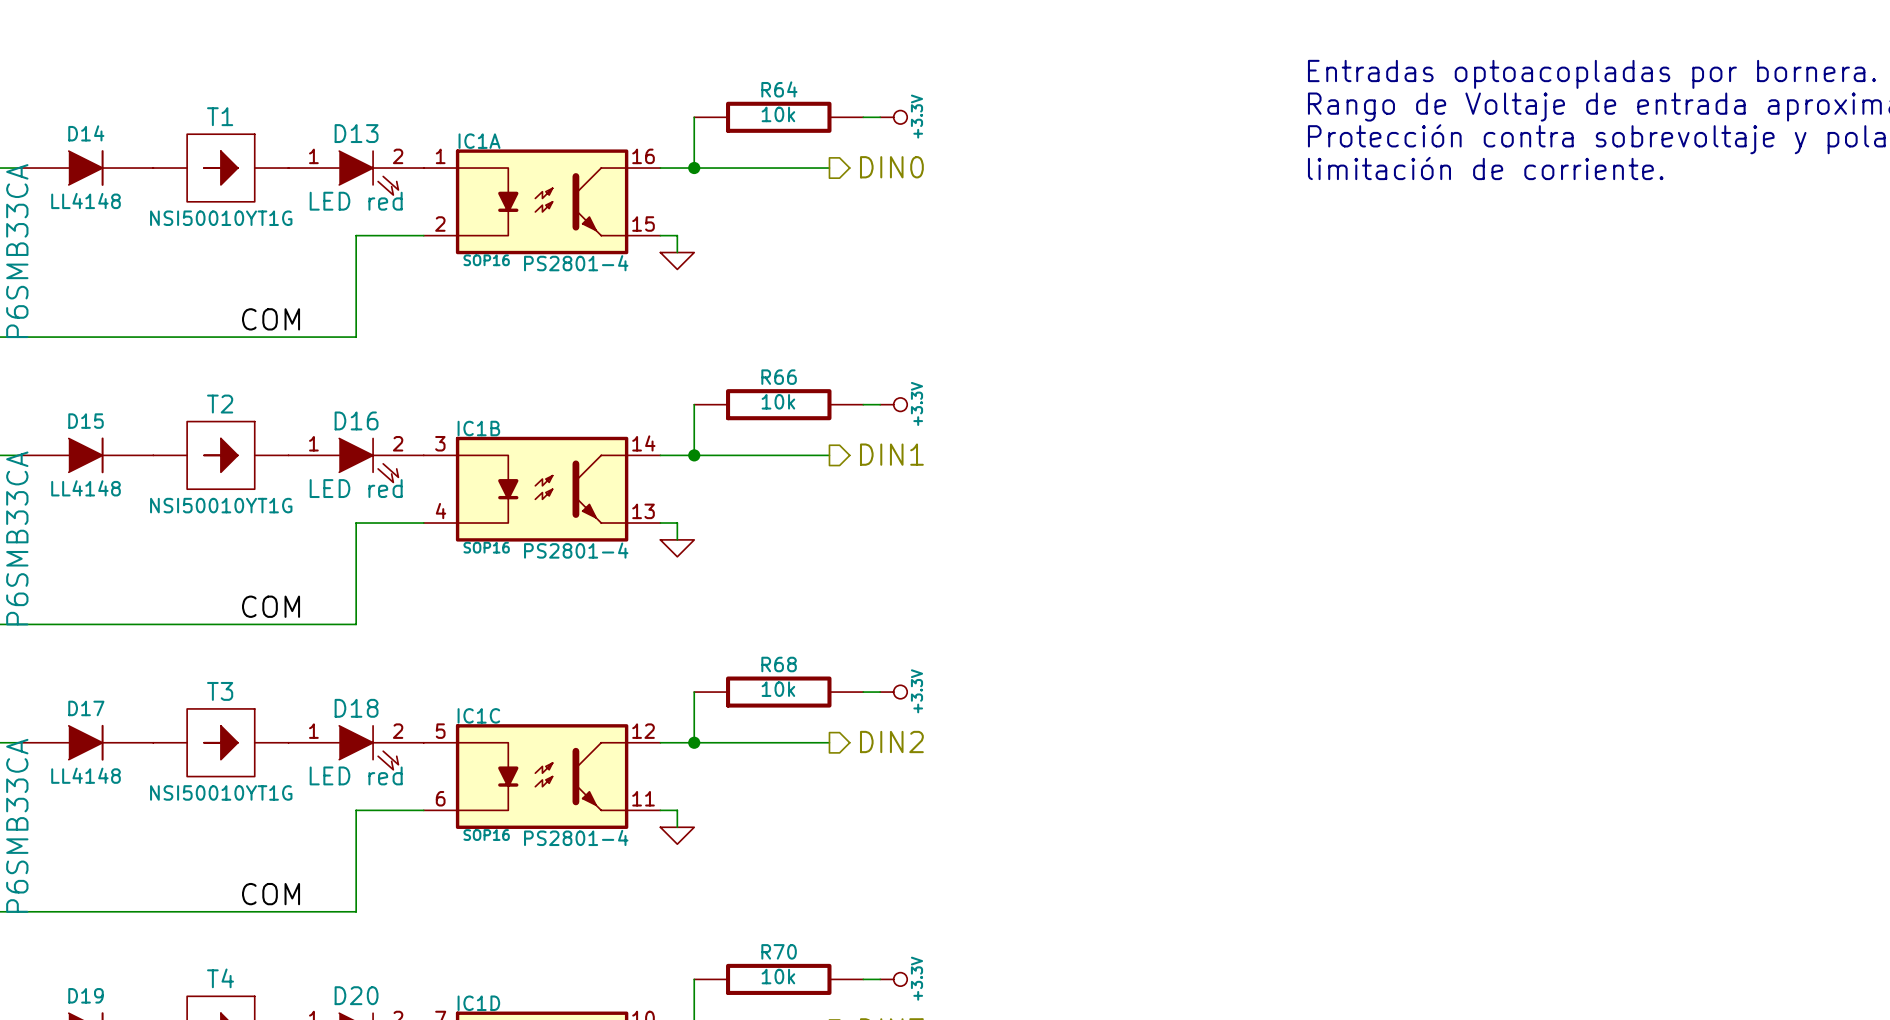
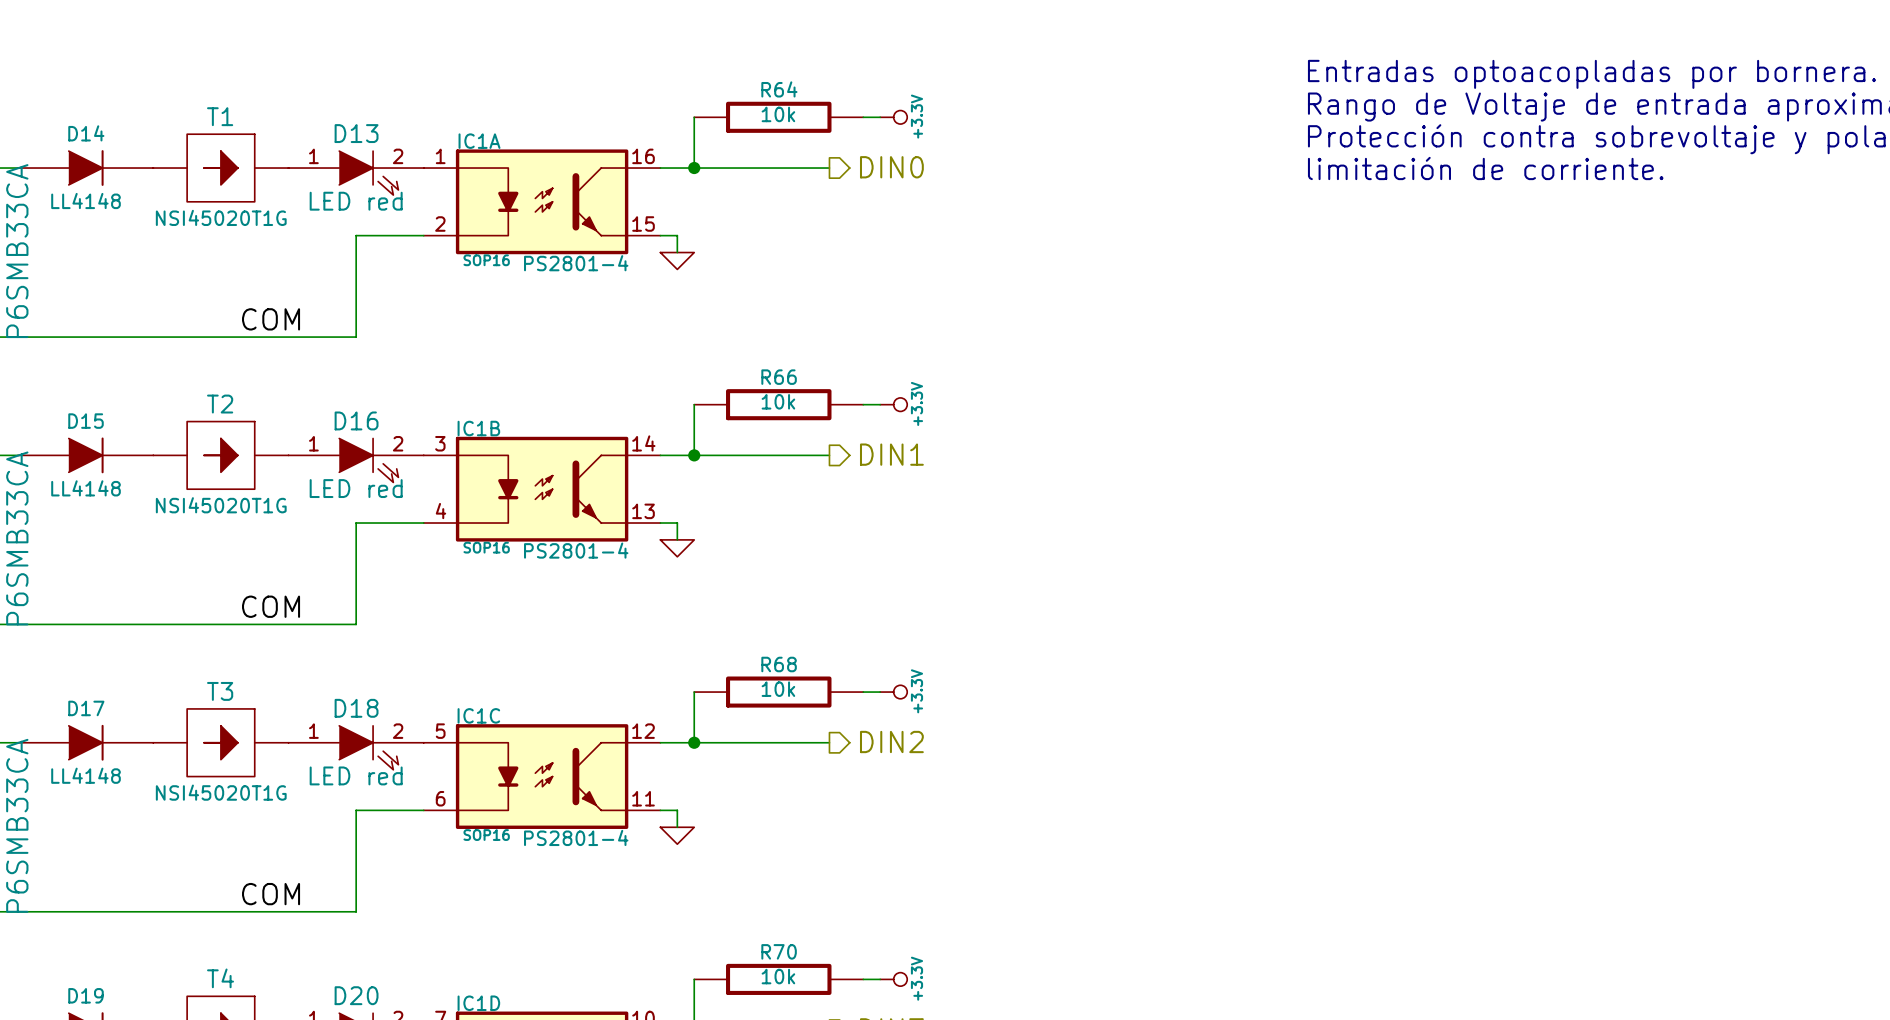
T1 value: NSI50010YT1G (221, 218) -> NSI45020T1G (221, 217)
T2 value: NSI50010YT1G (221, 505) -> NSI45020T1G (221, 505)
T3 value: NSI50010YT1G (221, 792) -> NSI45020T1G (221, 792)

